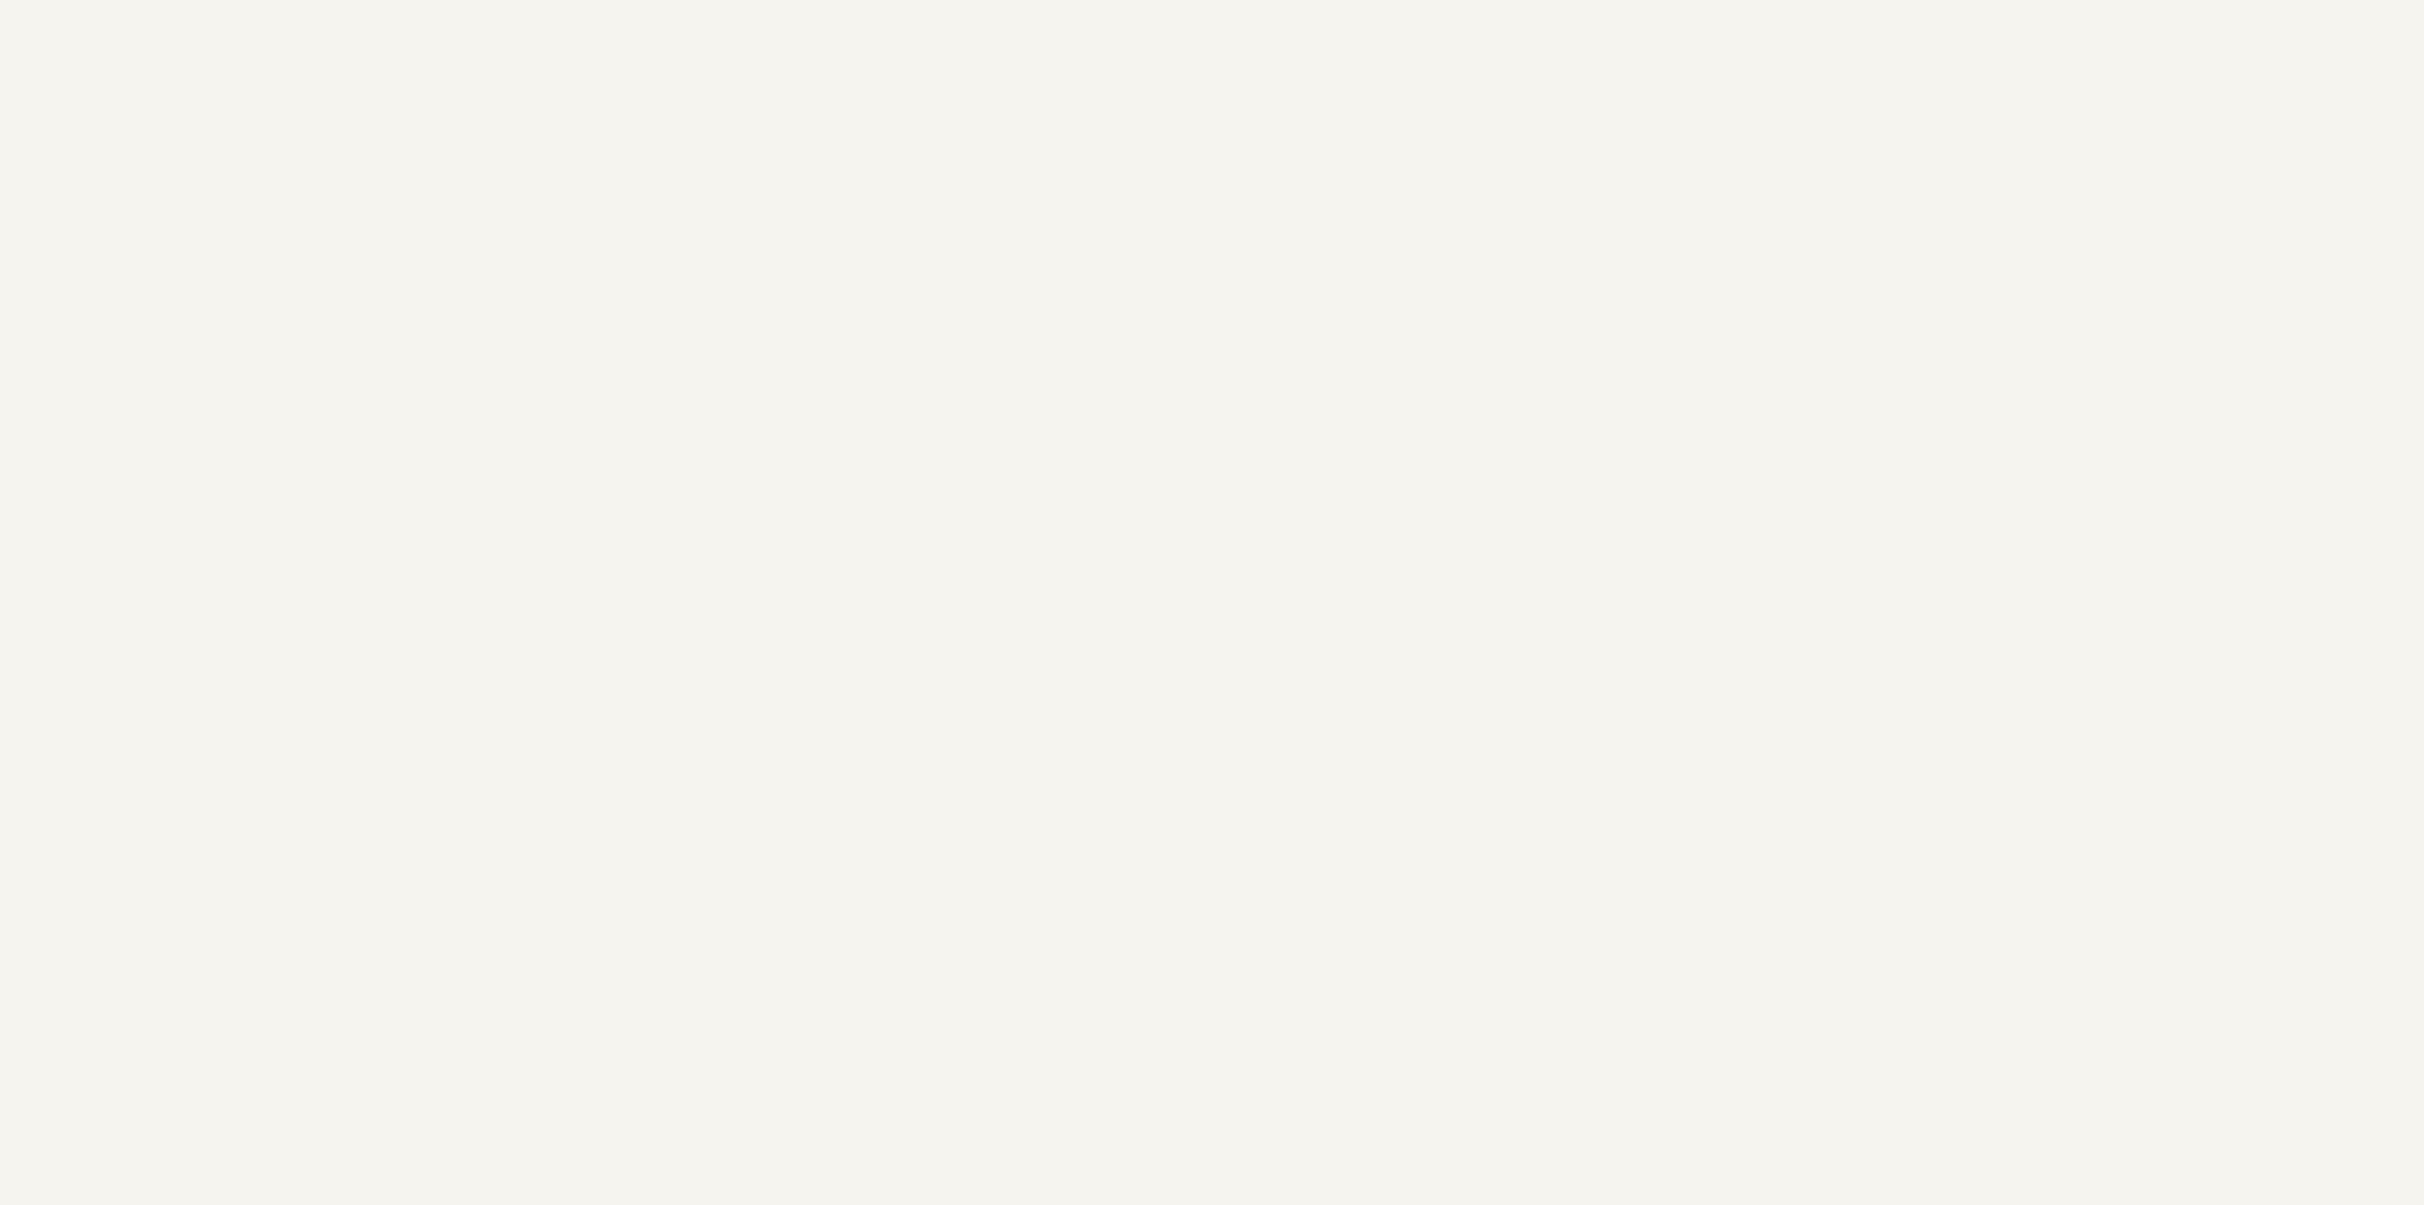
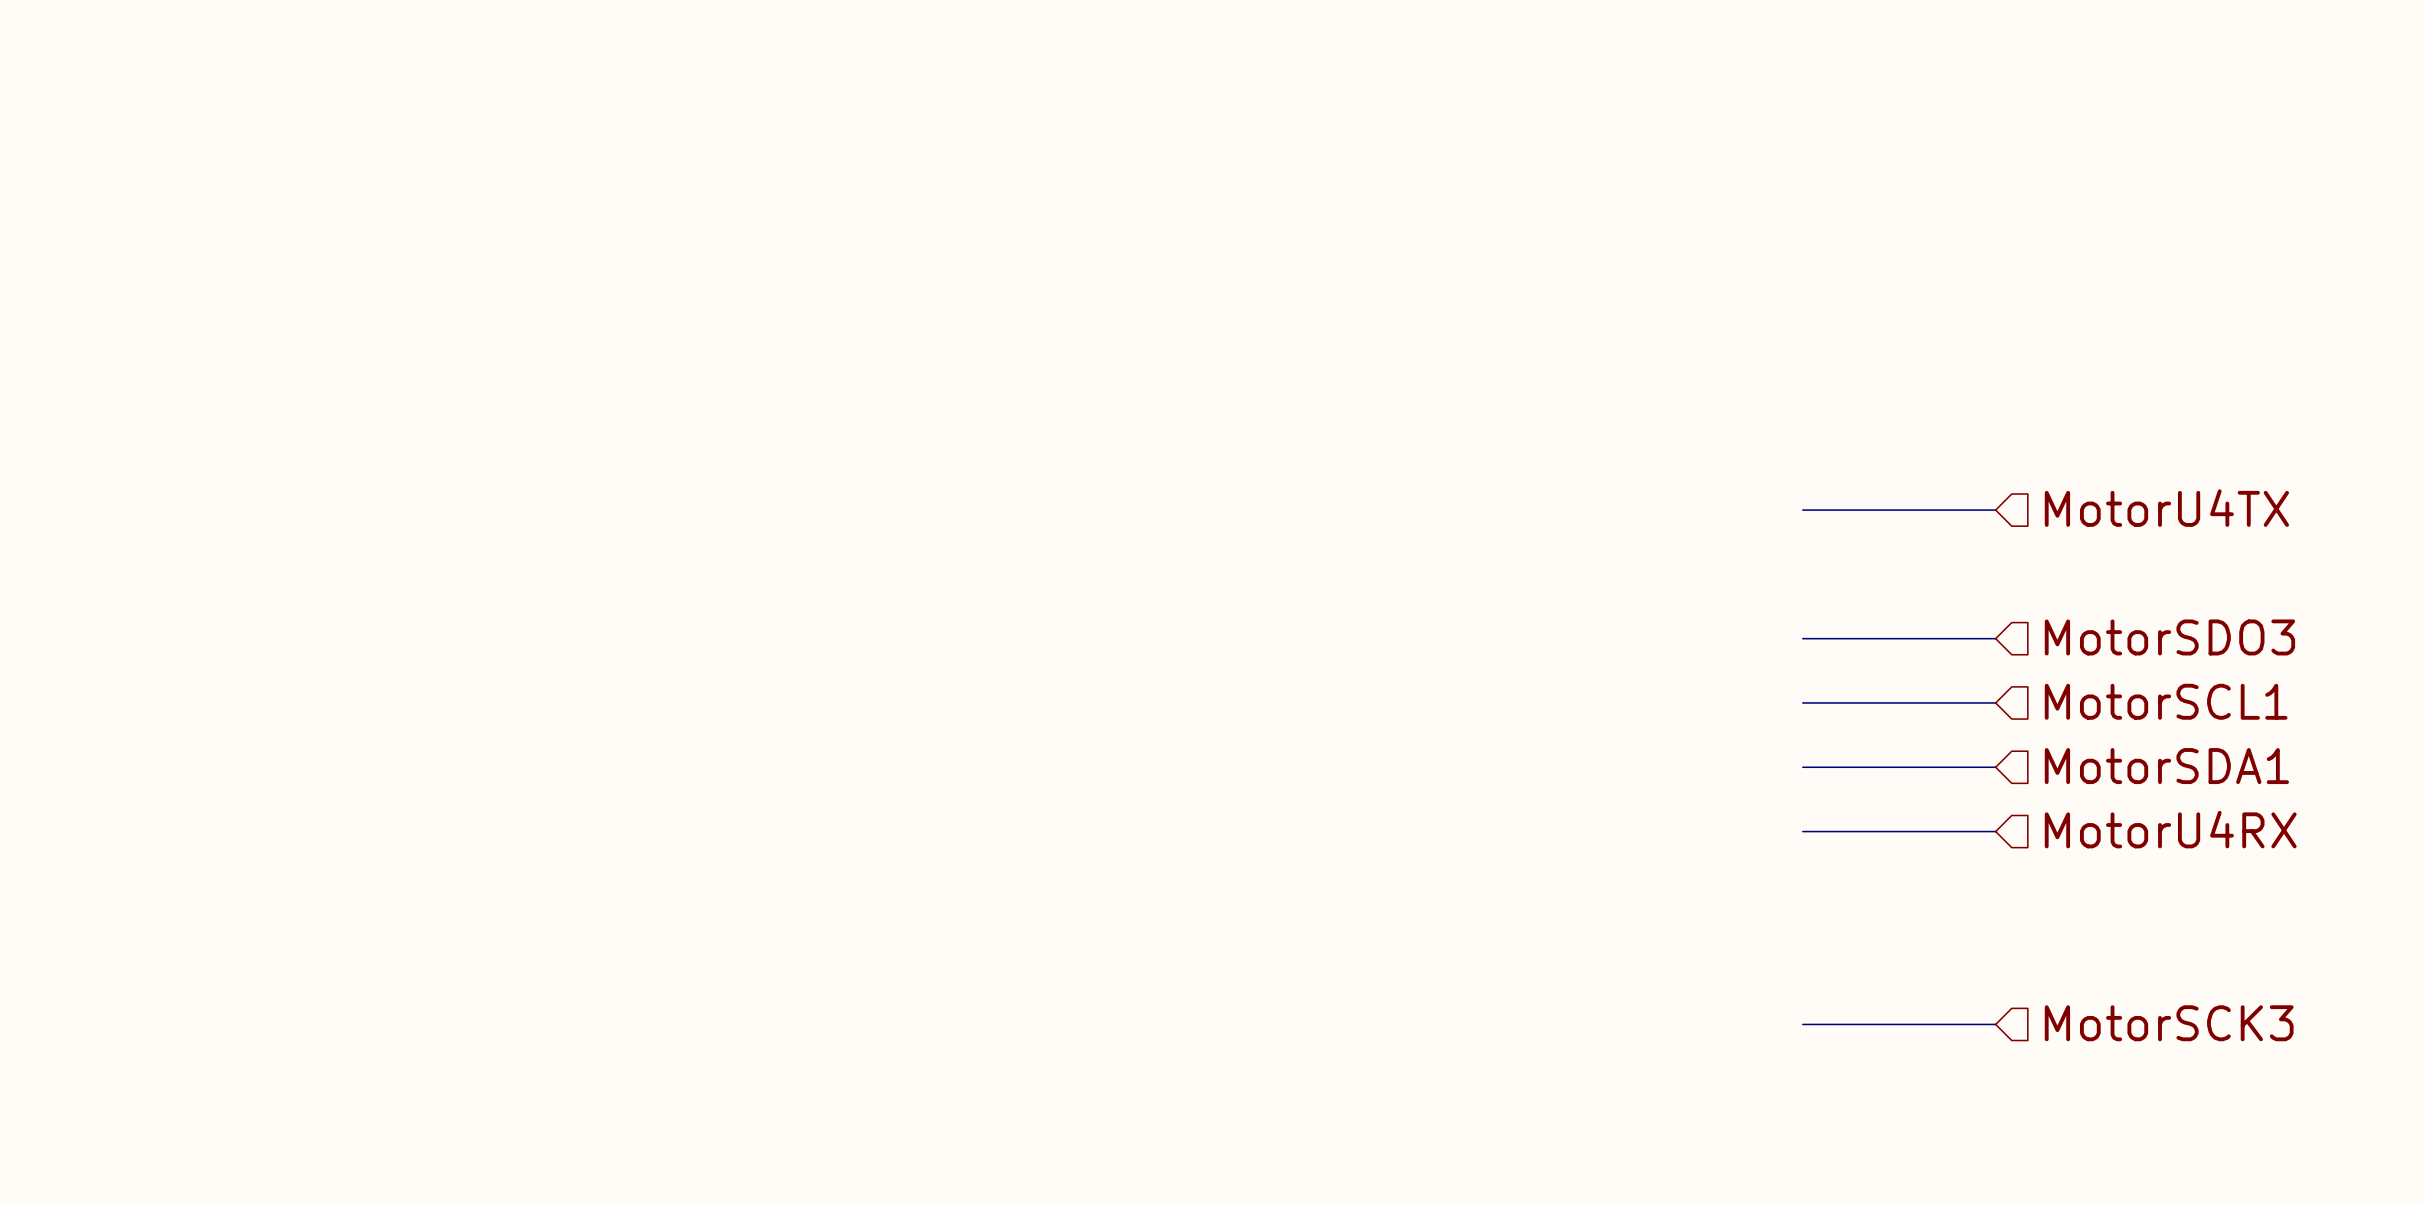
hierarchical label: none -> MotorU4TX (2166, 508)
wire: none -> (1802, 510) (1995, 510)
hierarchical label: none -> MotorSDO3 (2169, 637)
wire: none -> (1802, 638) (1995, 638)
hierarchical label: none -> MotorSCL1 (2166, 701)
wire: none -> (1802, 702) (1995, 702)
hierarchical label: none -> MotorSDA1 (2166, 766)
wire: none -> (1802, 767) (1995, 767)
hierarchical label: none -> MotorU4RX (2170, 829)
wire: none -> (1802, 831) (1995, 831)
hierarchical label: none -> MotorSCK3 (2169, 1023)
wire: none -> (1802, 1024) (1995, 1024)

